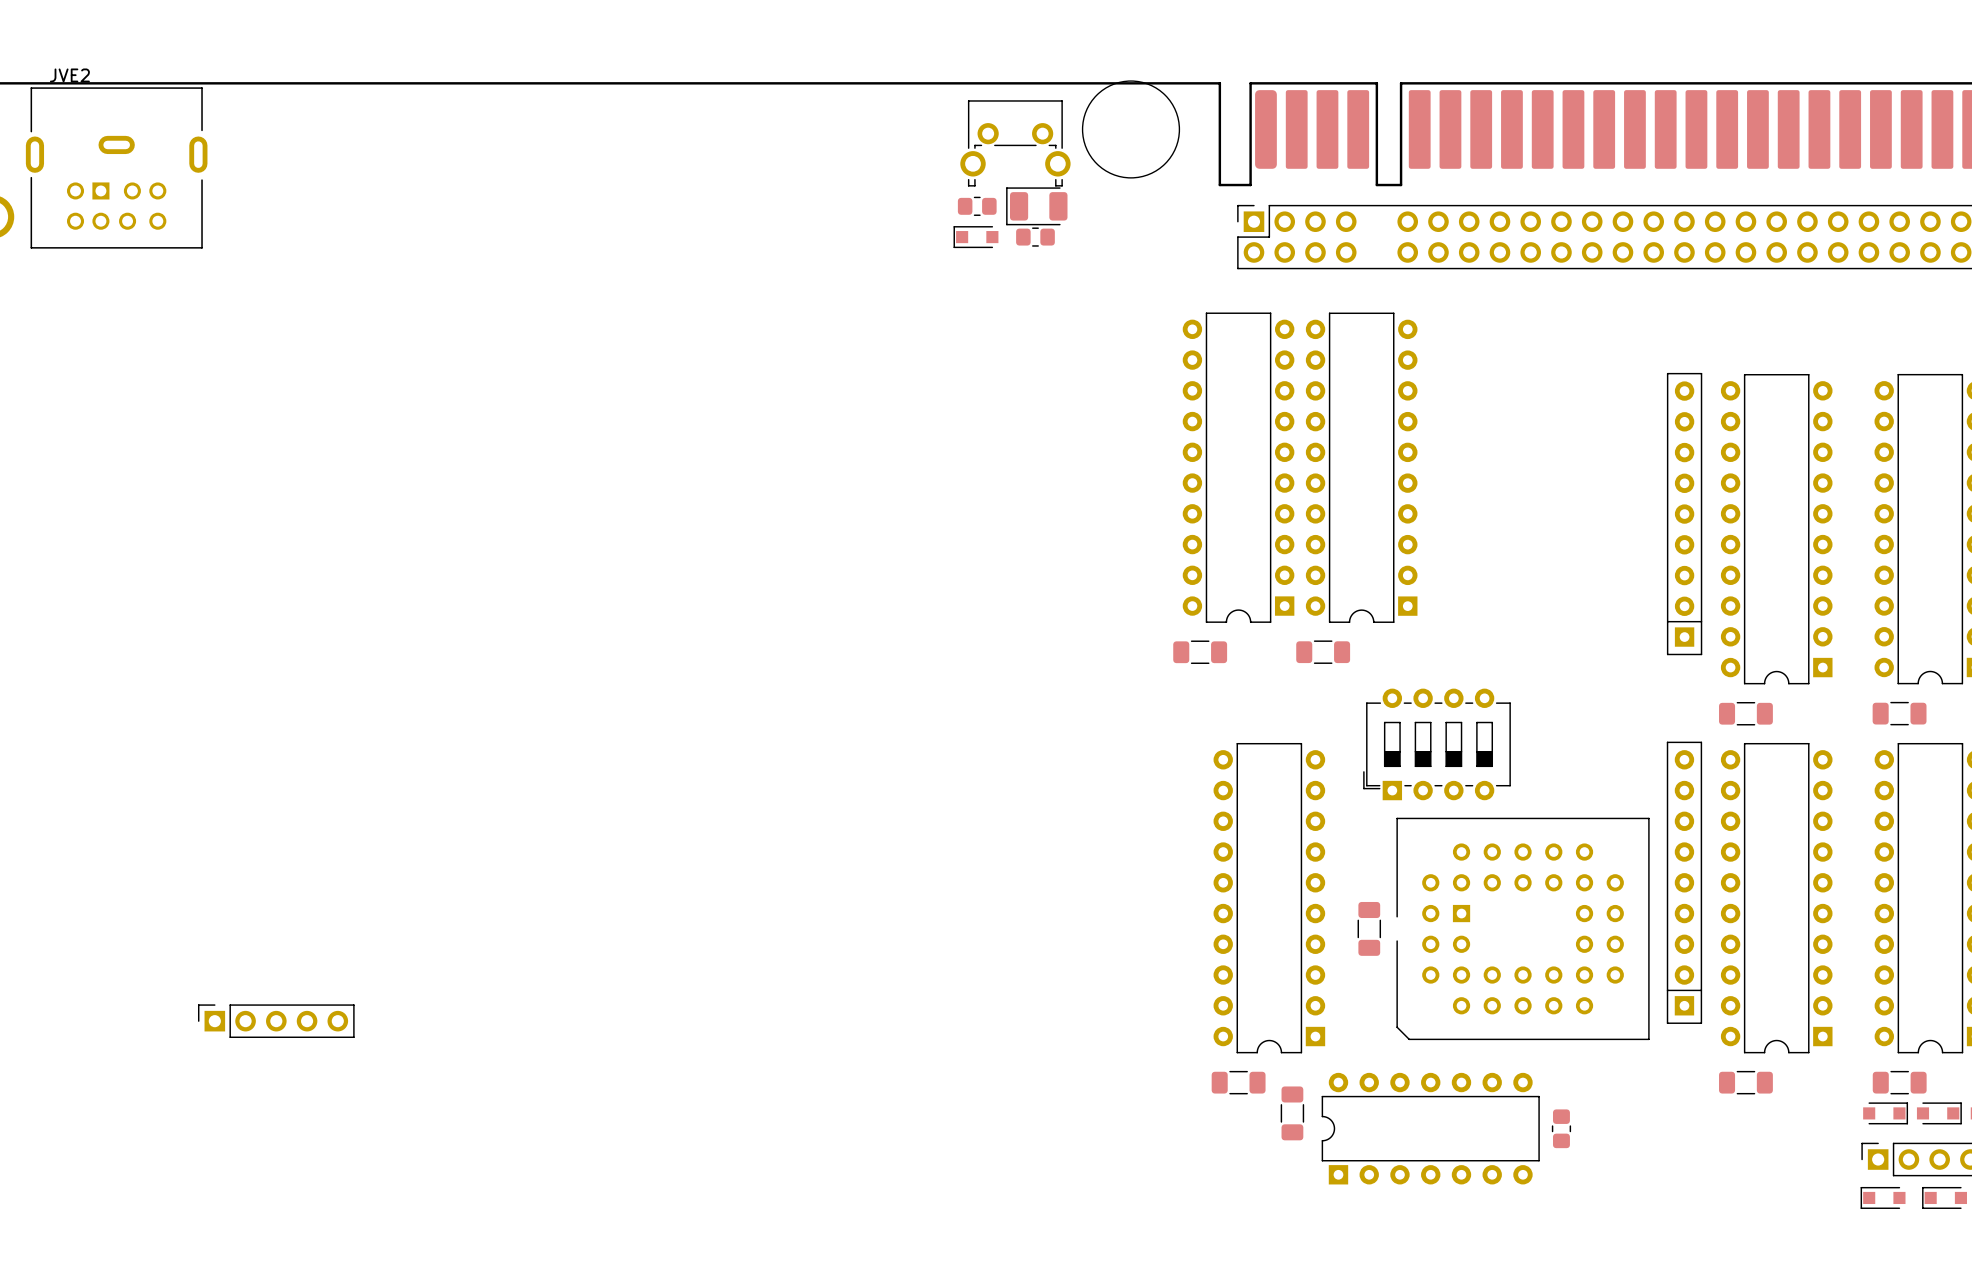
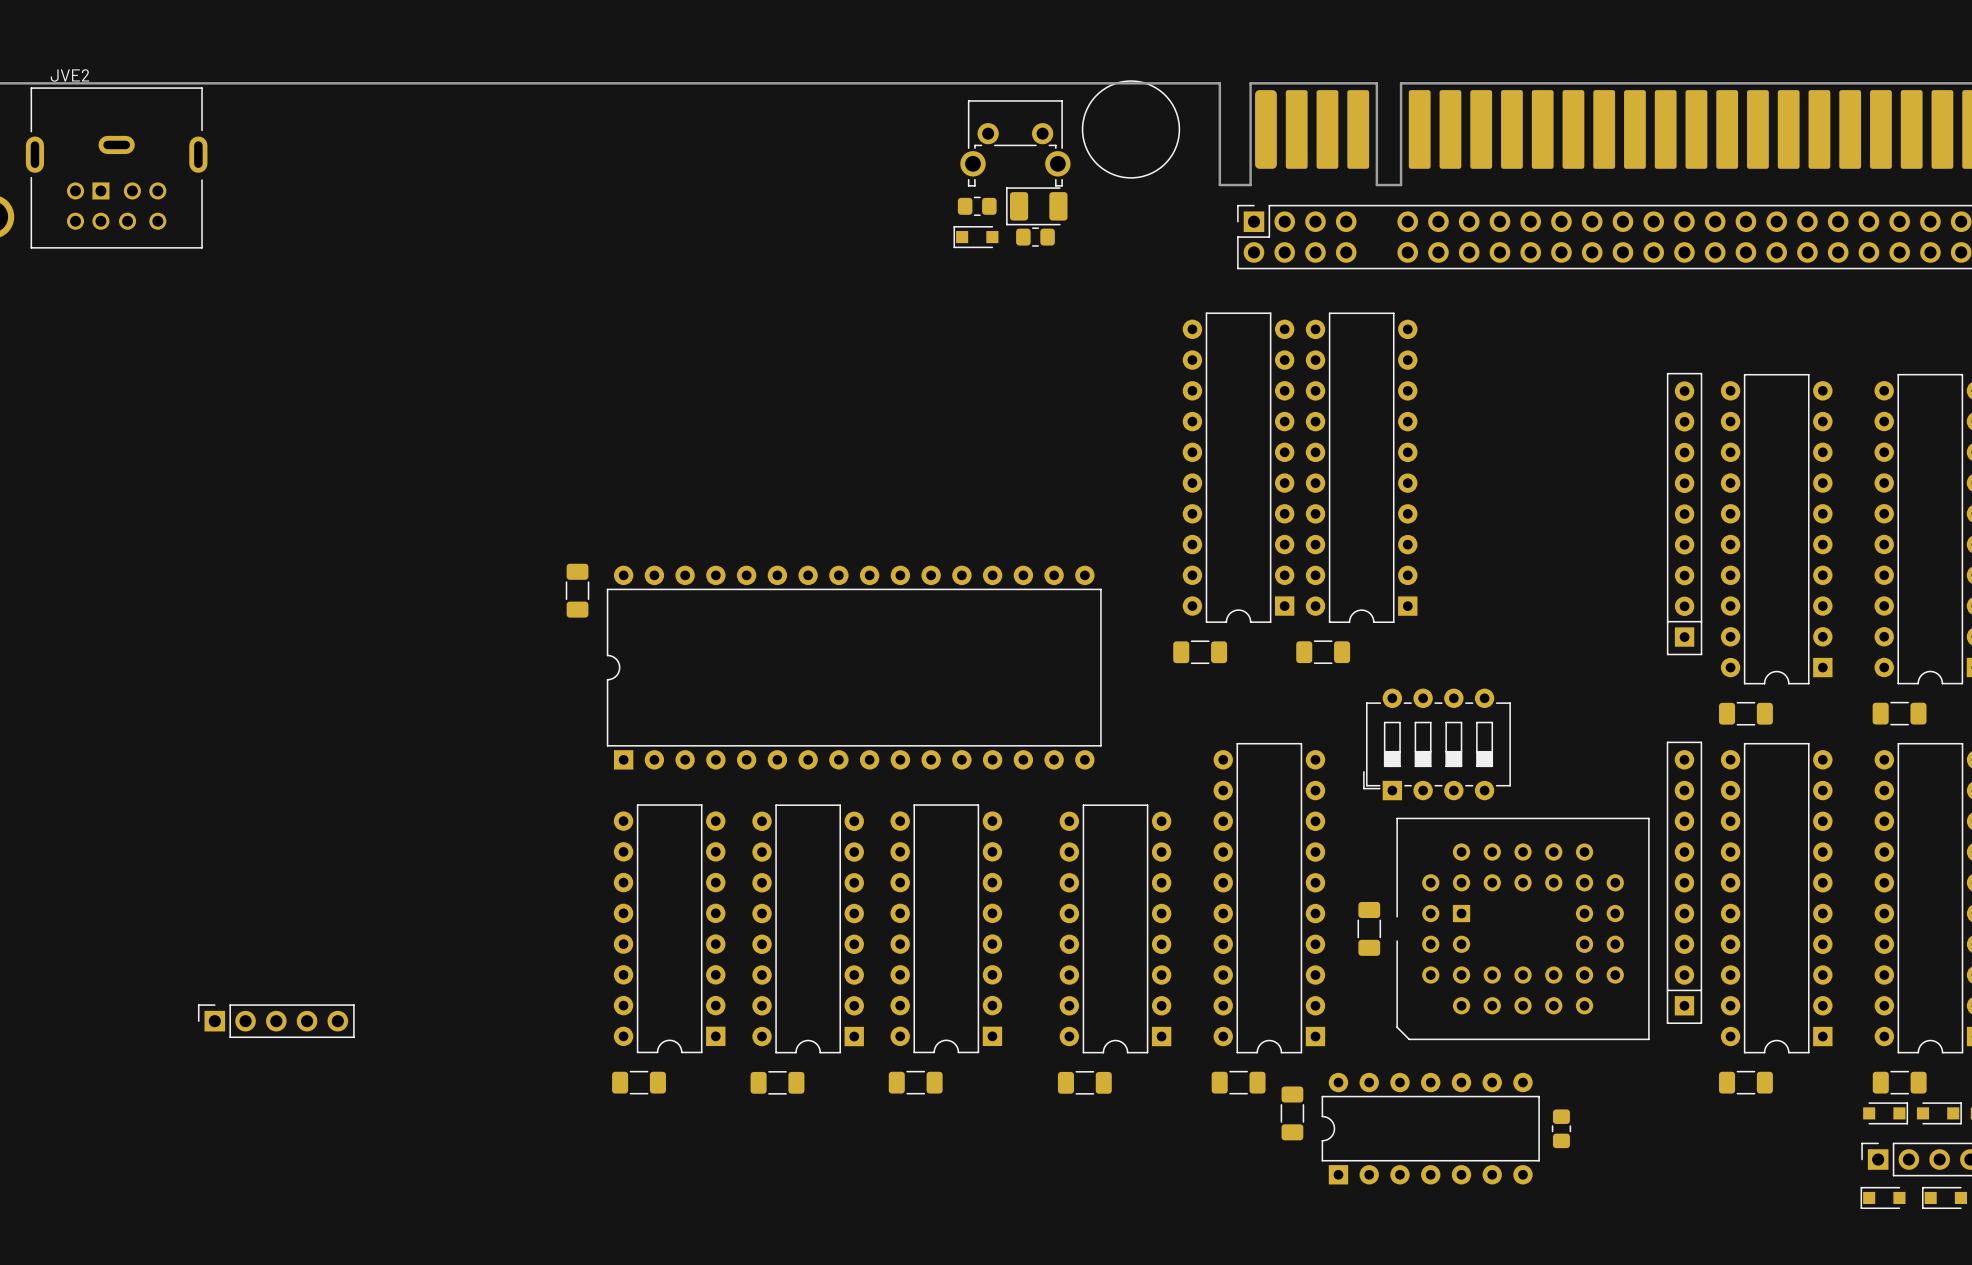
part: none -> (577, 590)
part: none -> (854, 667)
part: none -> (669, 928)
part: none -> (808, 928)
part: none -> (946, 928)
part: none -> (1115, 928)
part: none -> (639, 1082)
part: none -> (777, 1082)
part: none -> (915, 1082)
part: none -> (1084, 1082)

